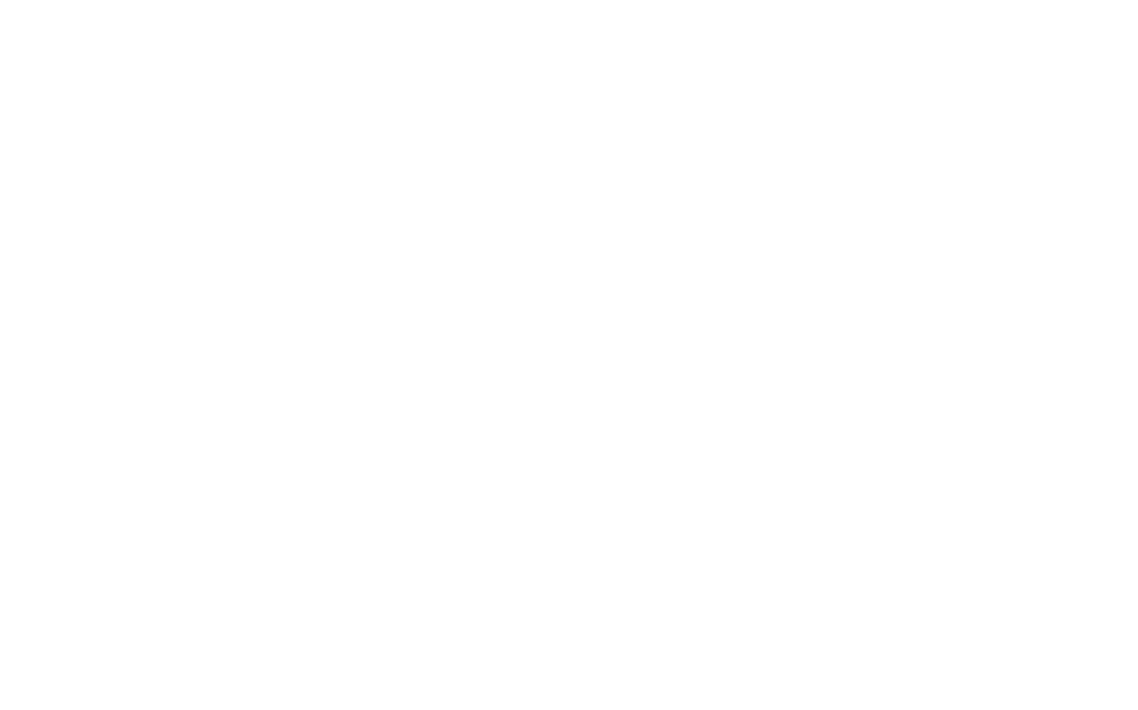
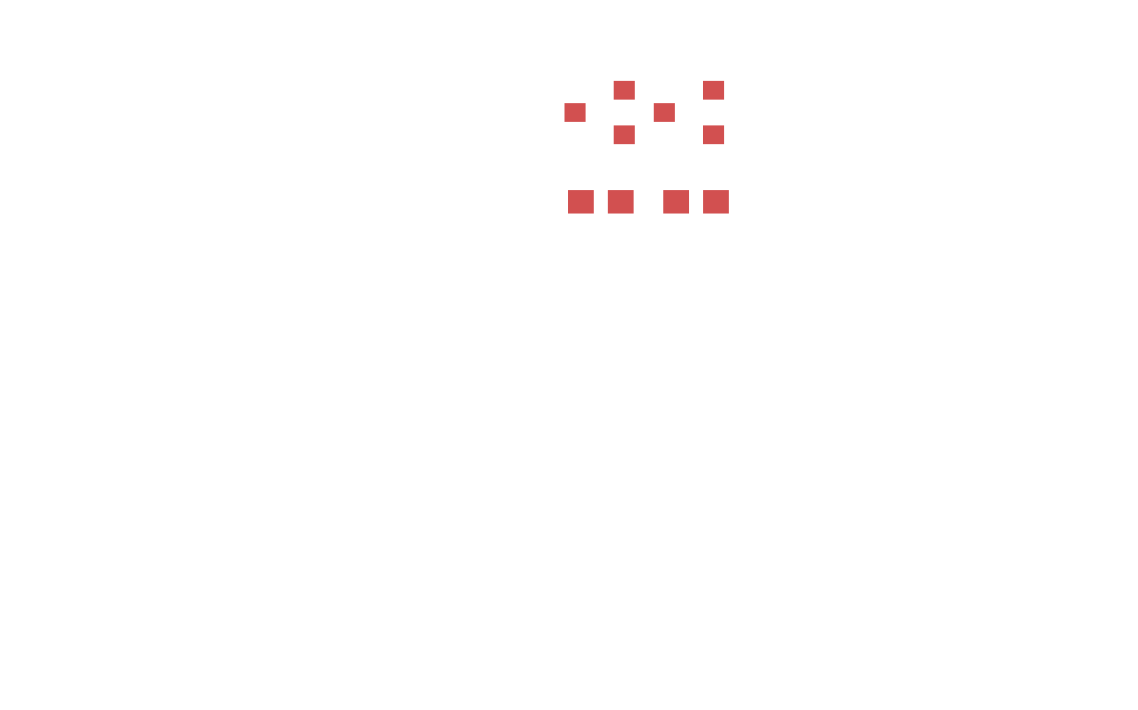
part: none -> (599, 112)
part: none -> (688, 112)
part: none -> (600, 201)
part: none -> (696, 201)

